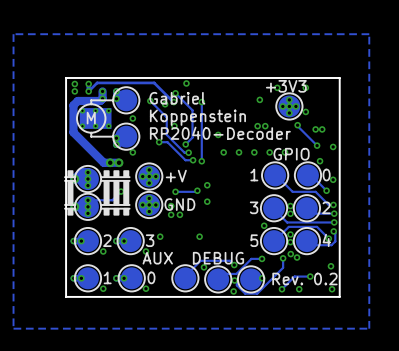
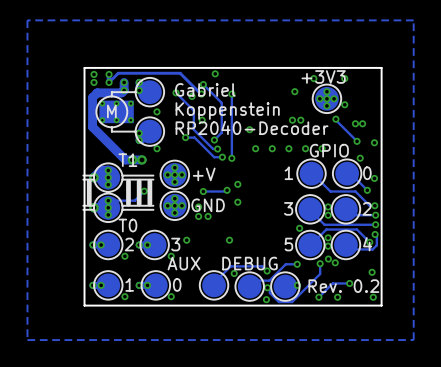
part value: none -> T1 (127, 160)
drawing: [67, 170, 74, 216] -> none
drawing: [103, 170, 130, 216] -> none
line: none -> (89, 181) (89, 204)
line: none -> (128, 181) (128, 204)
line: none -> (139, 181) (139, 204)
line: none -> (149, 181) (149, 204)
part value: none -> T0 (127, 225)

